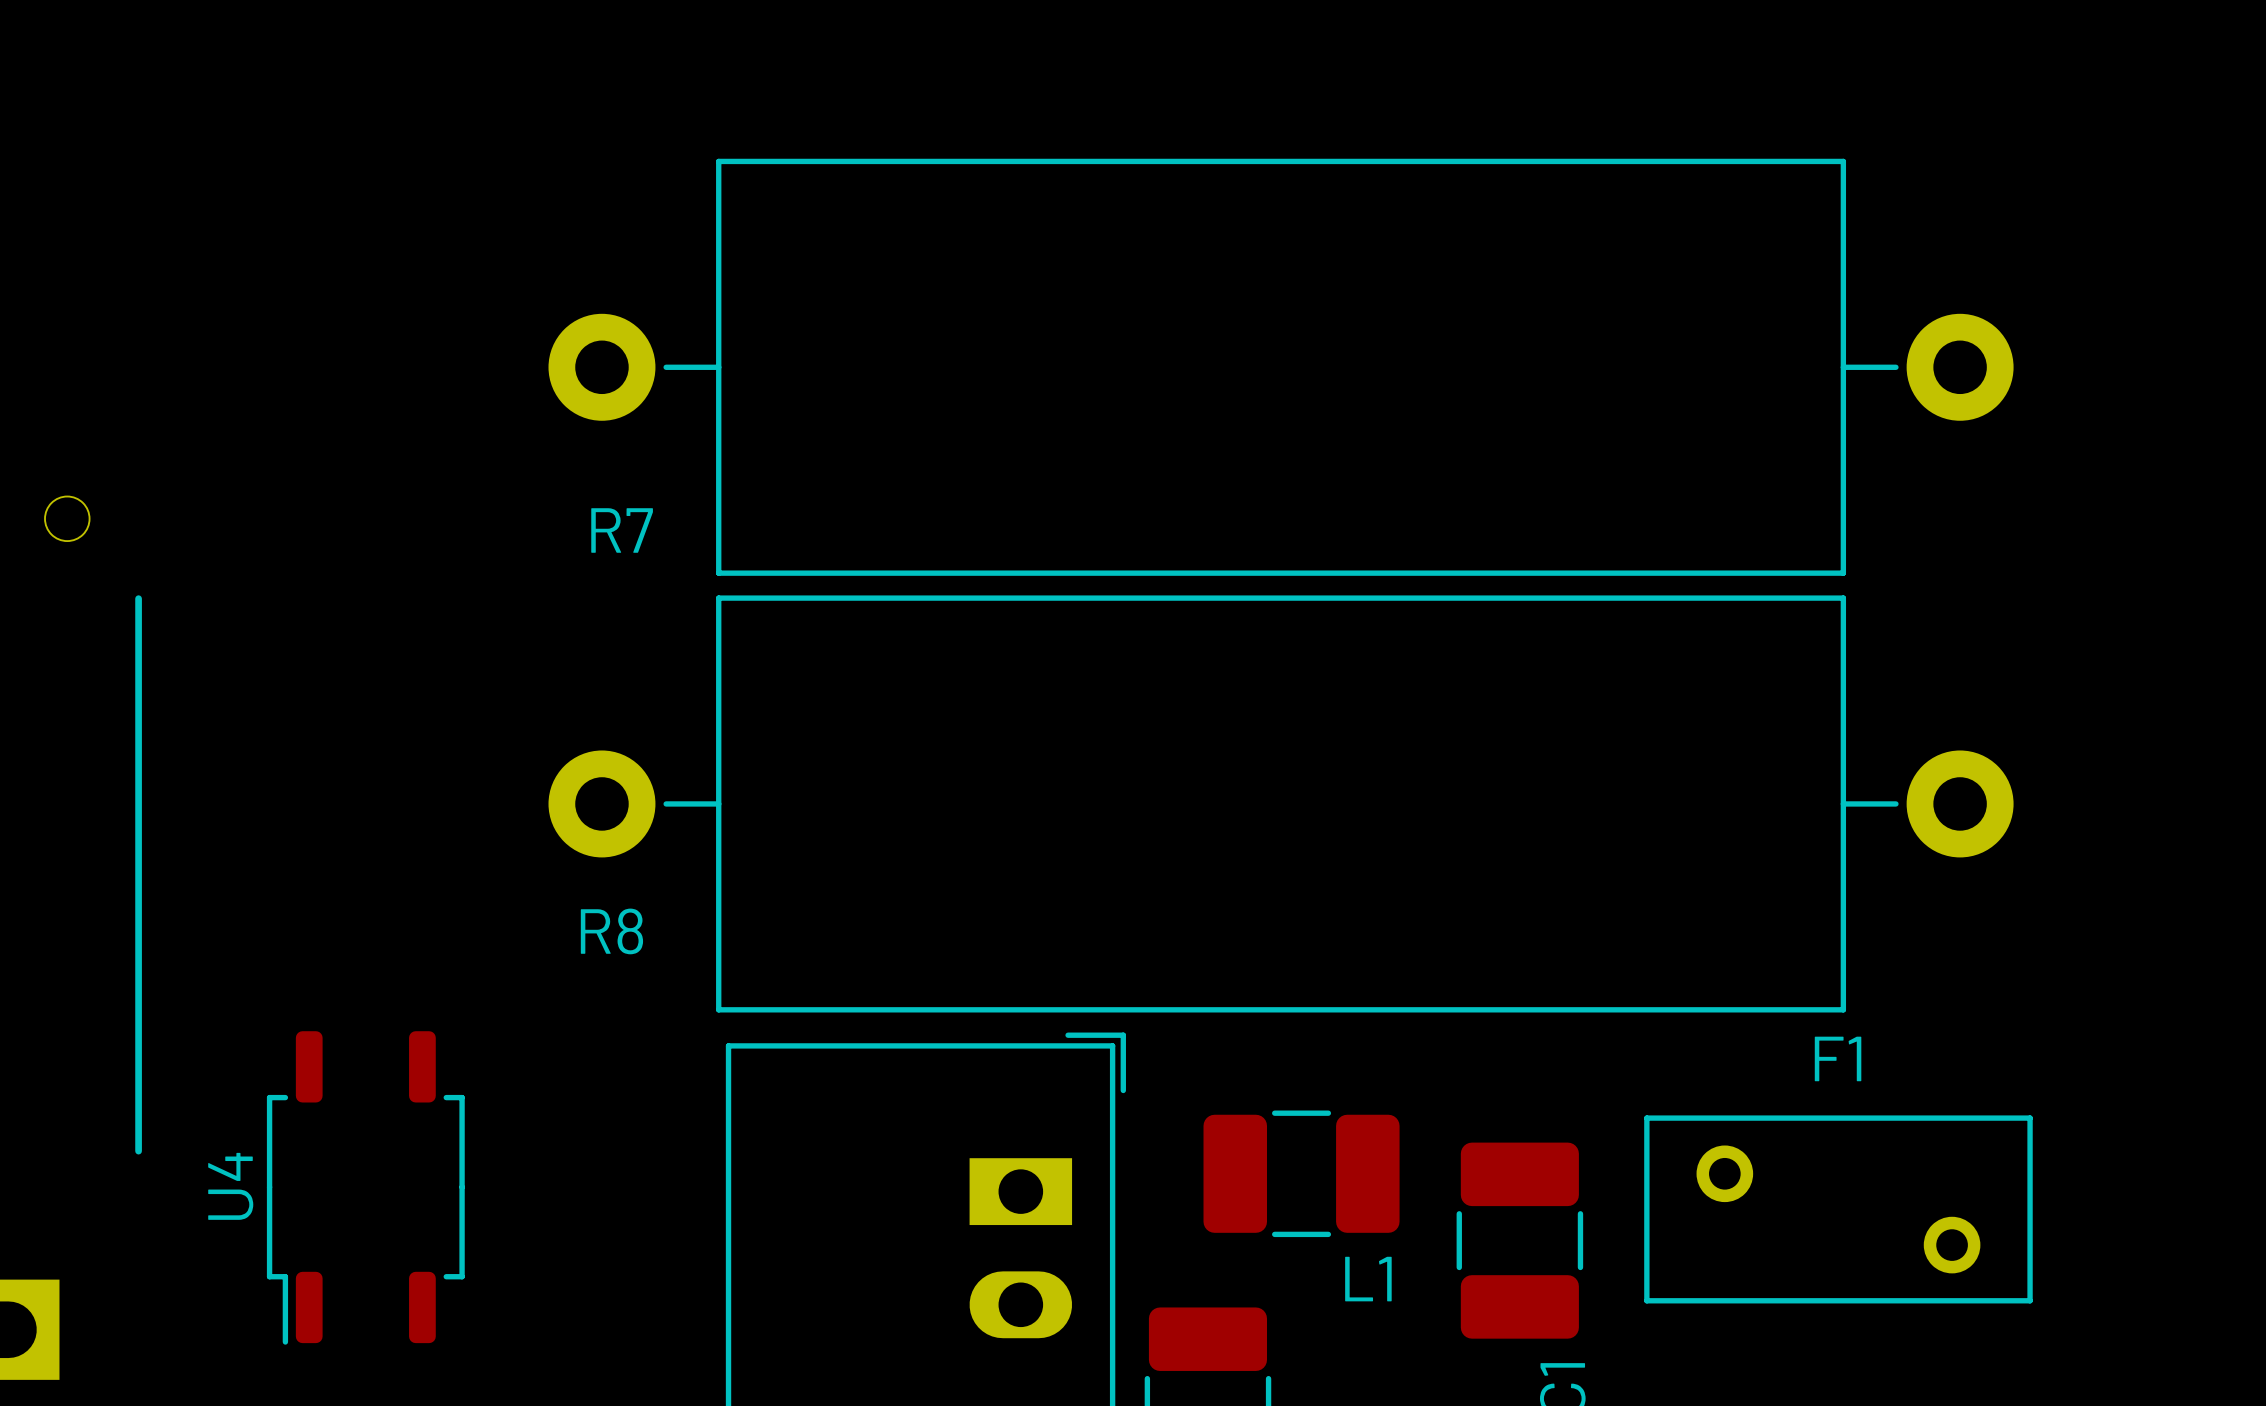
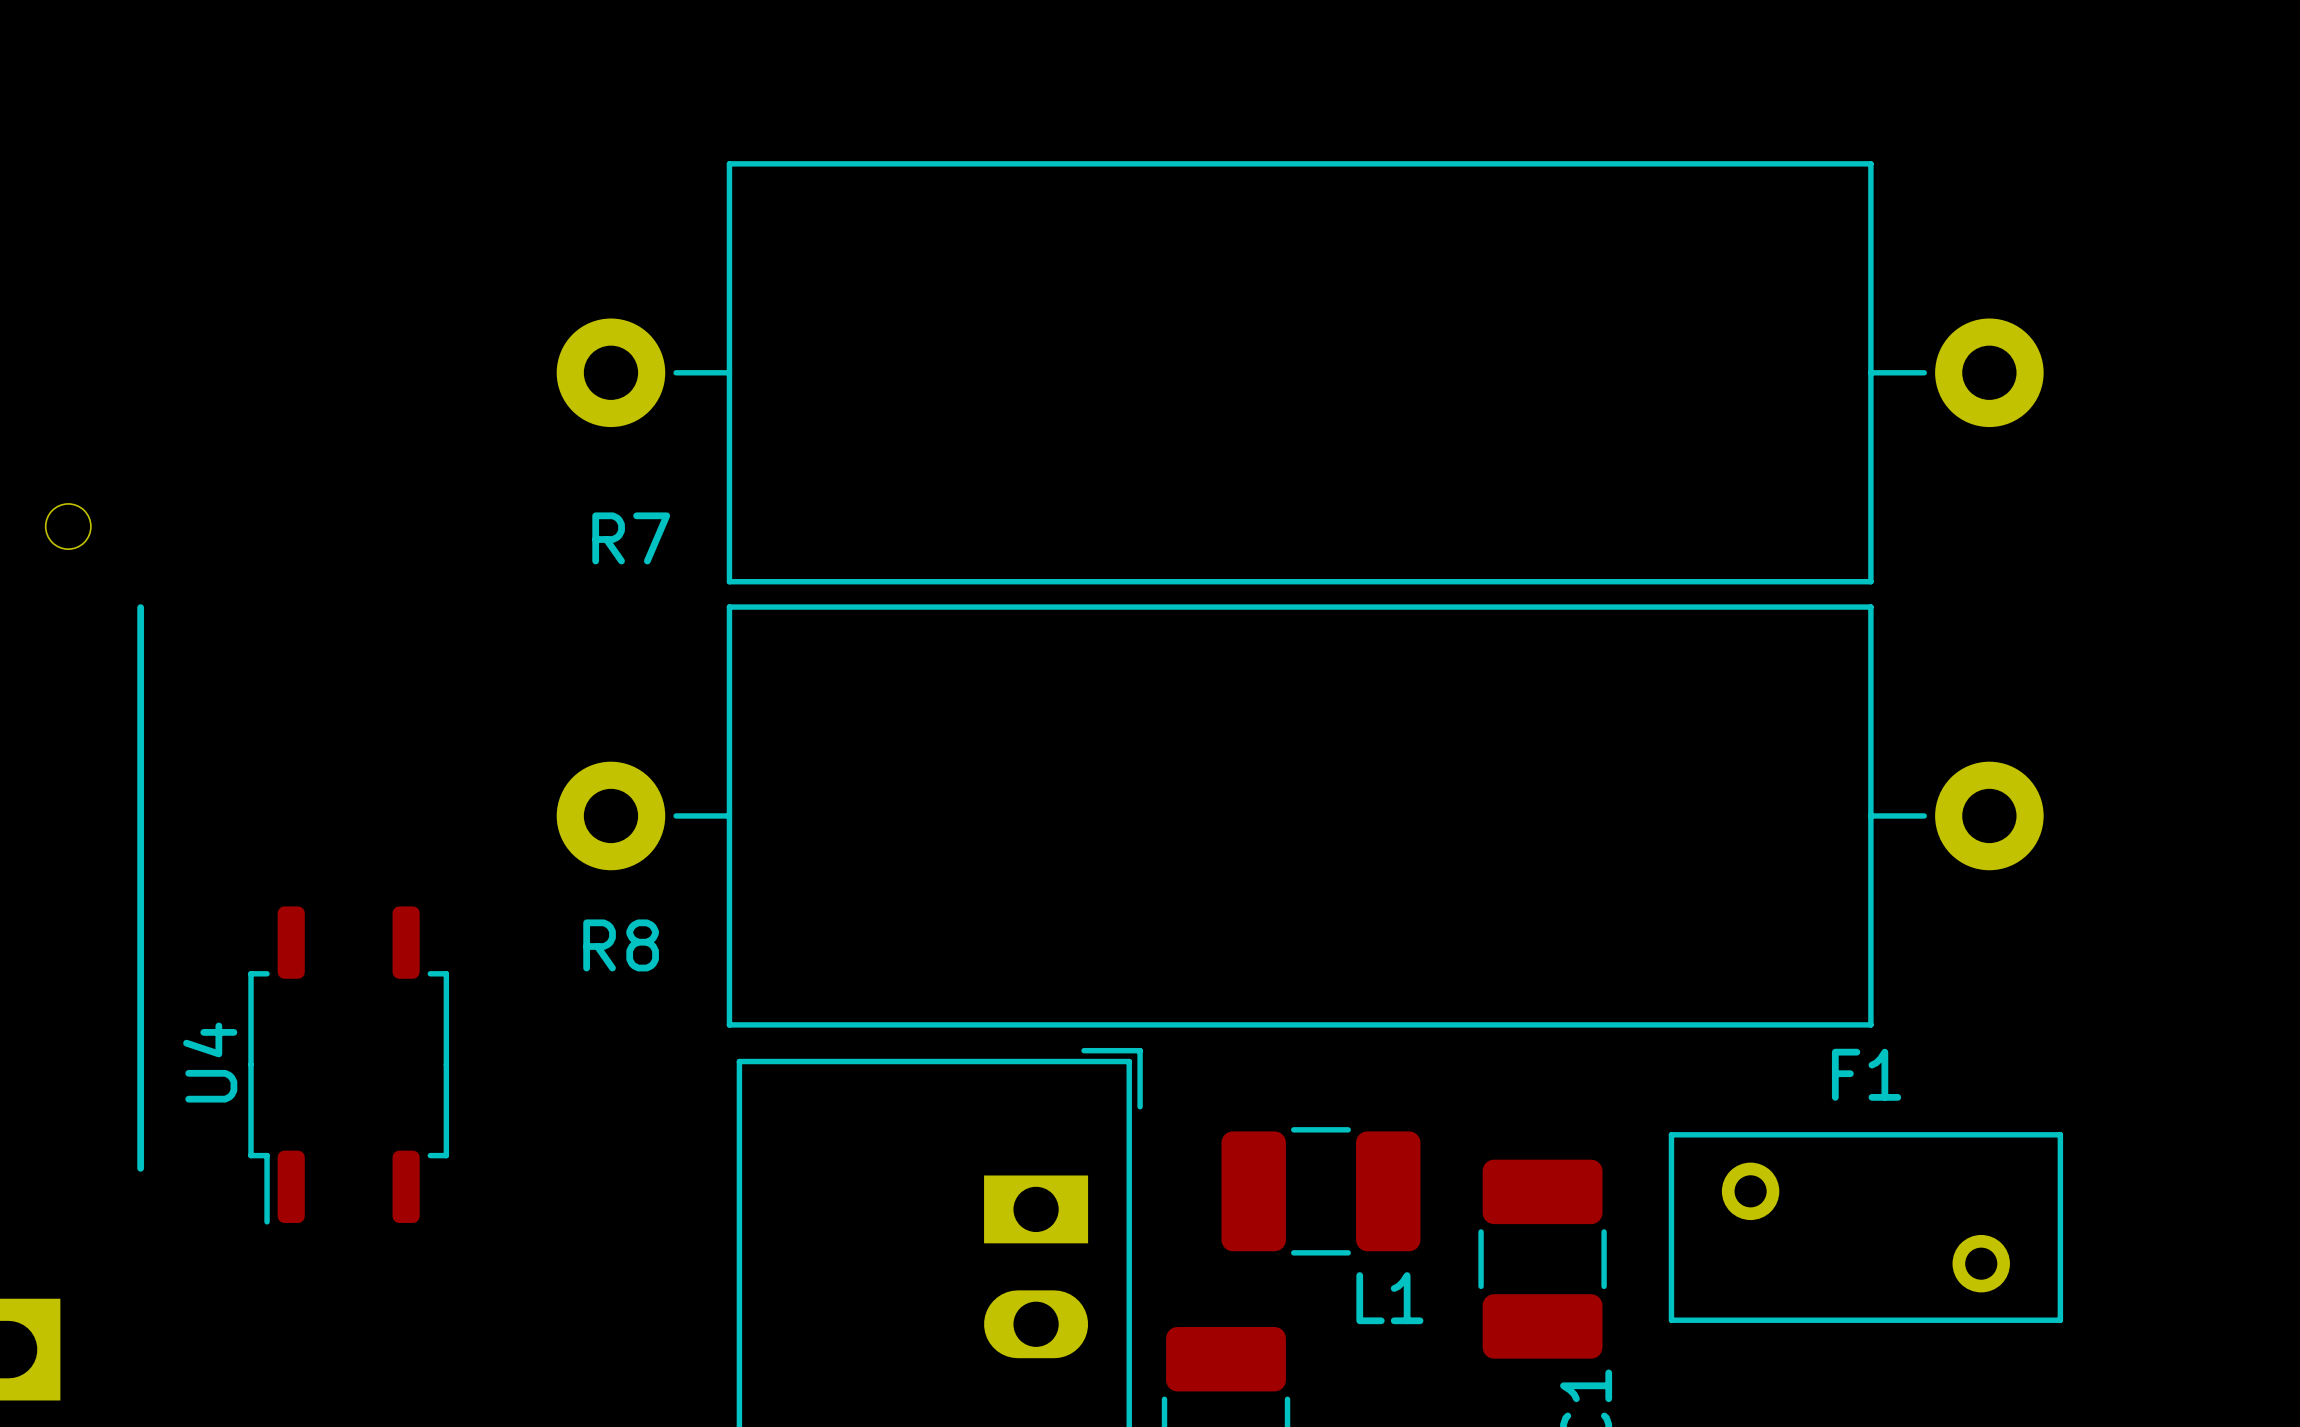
U4 position: (365, 1187) -> (348, 1065)

